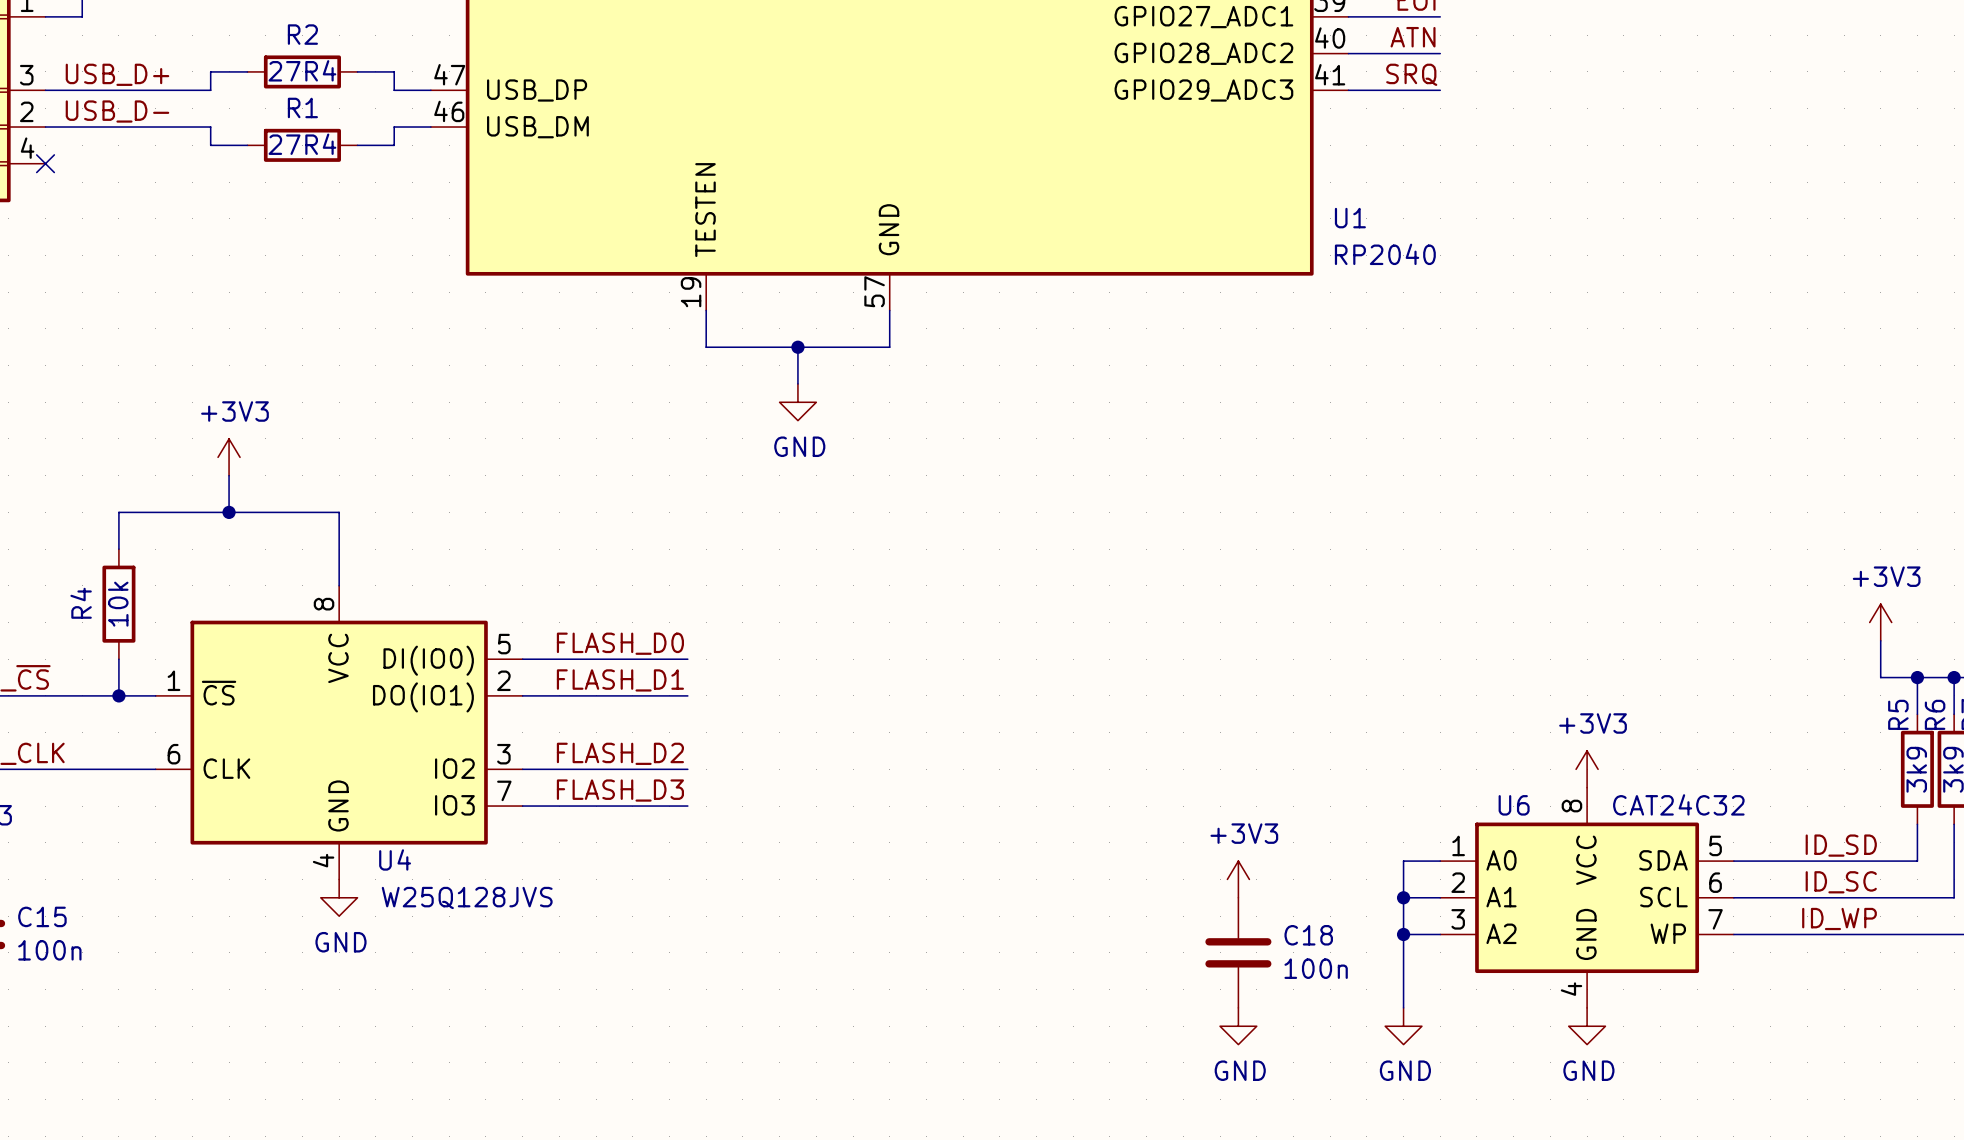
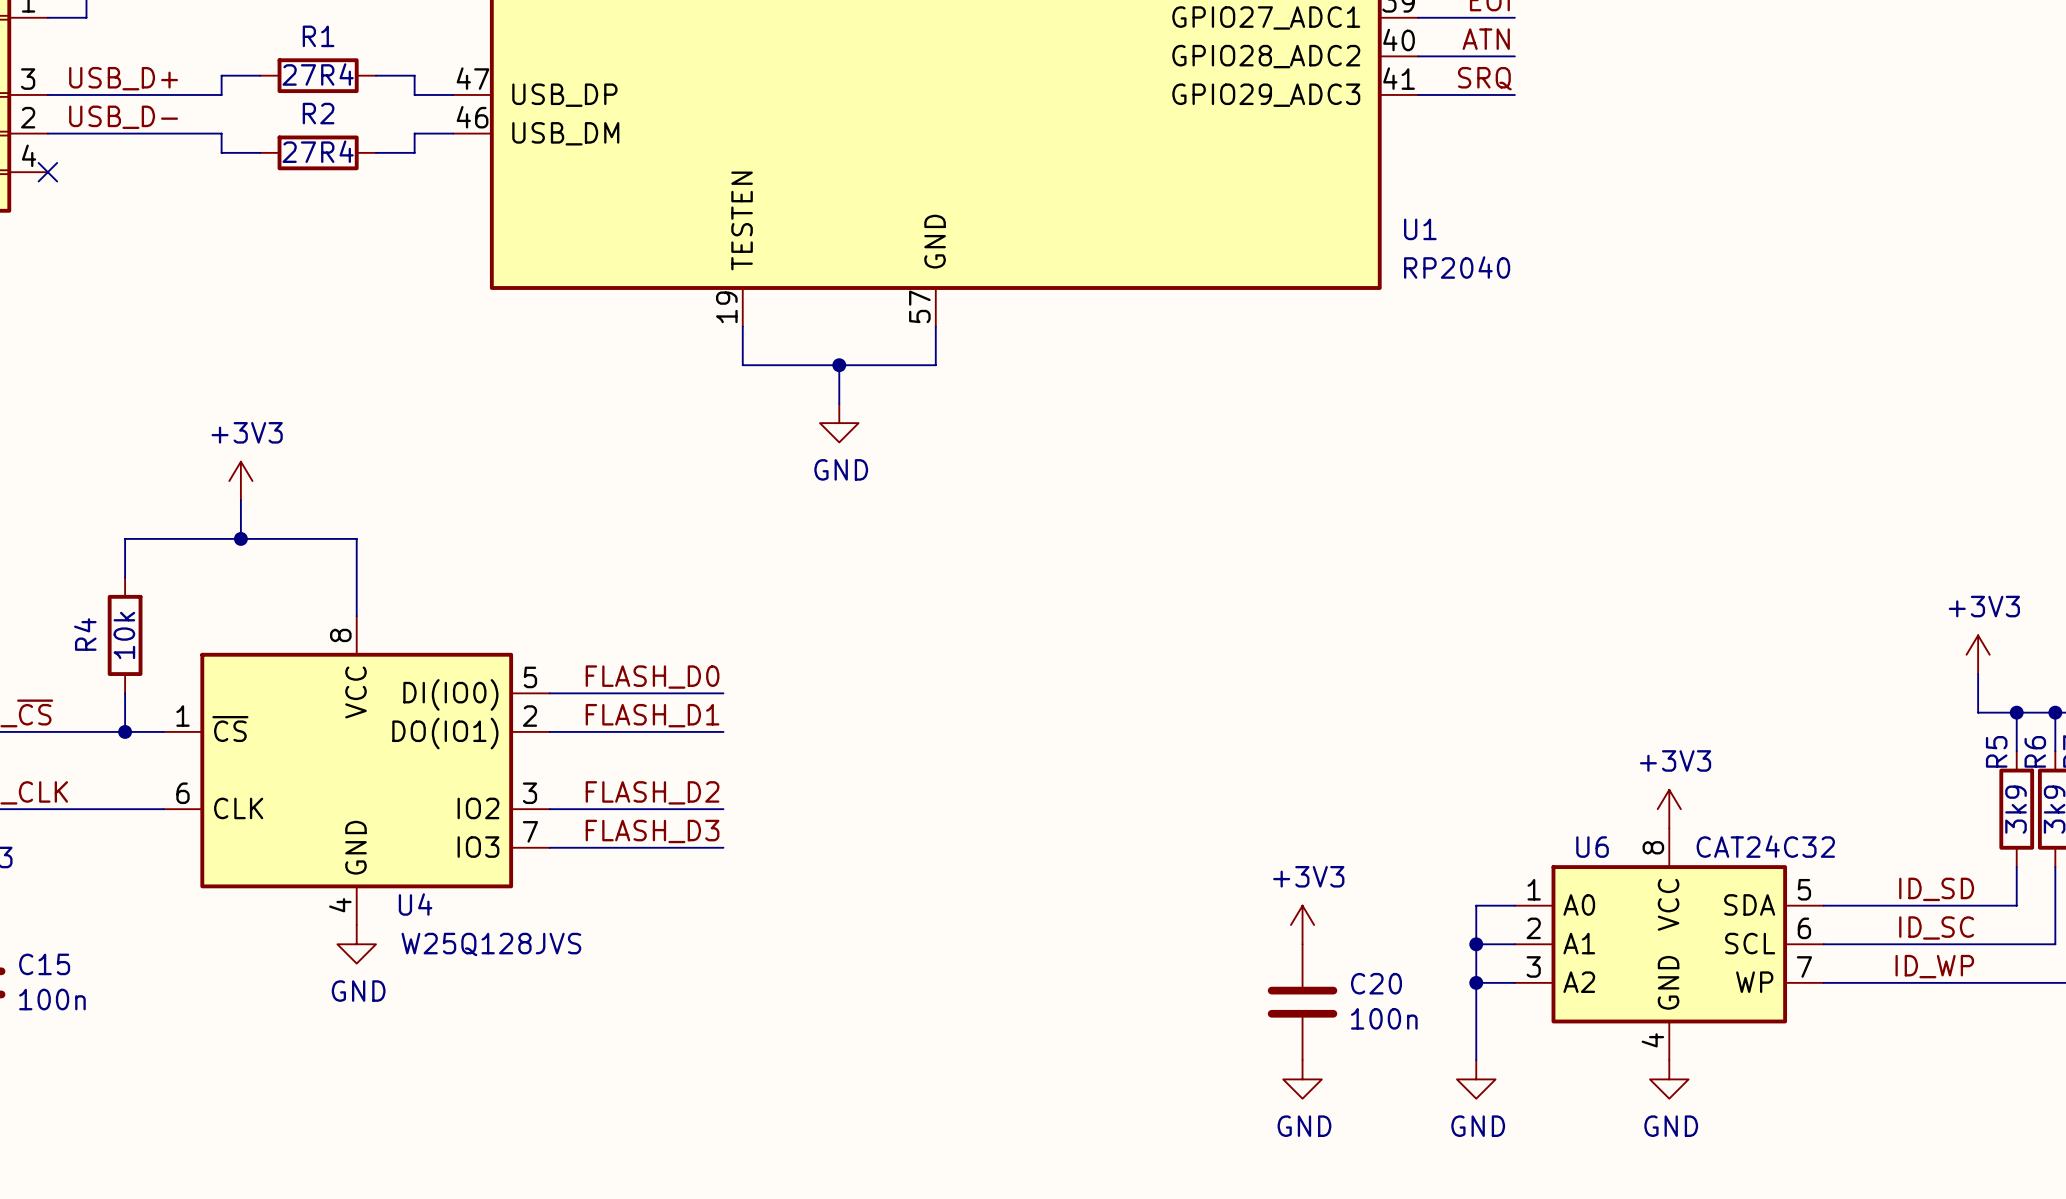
R2 name: R2 (302, 34) -> R1 (318, 36)
R1 name: R1 (302, 107) -> R2 (318, 113)
C18 name: C18 (1308, 935) -> C20 (1376, 983)

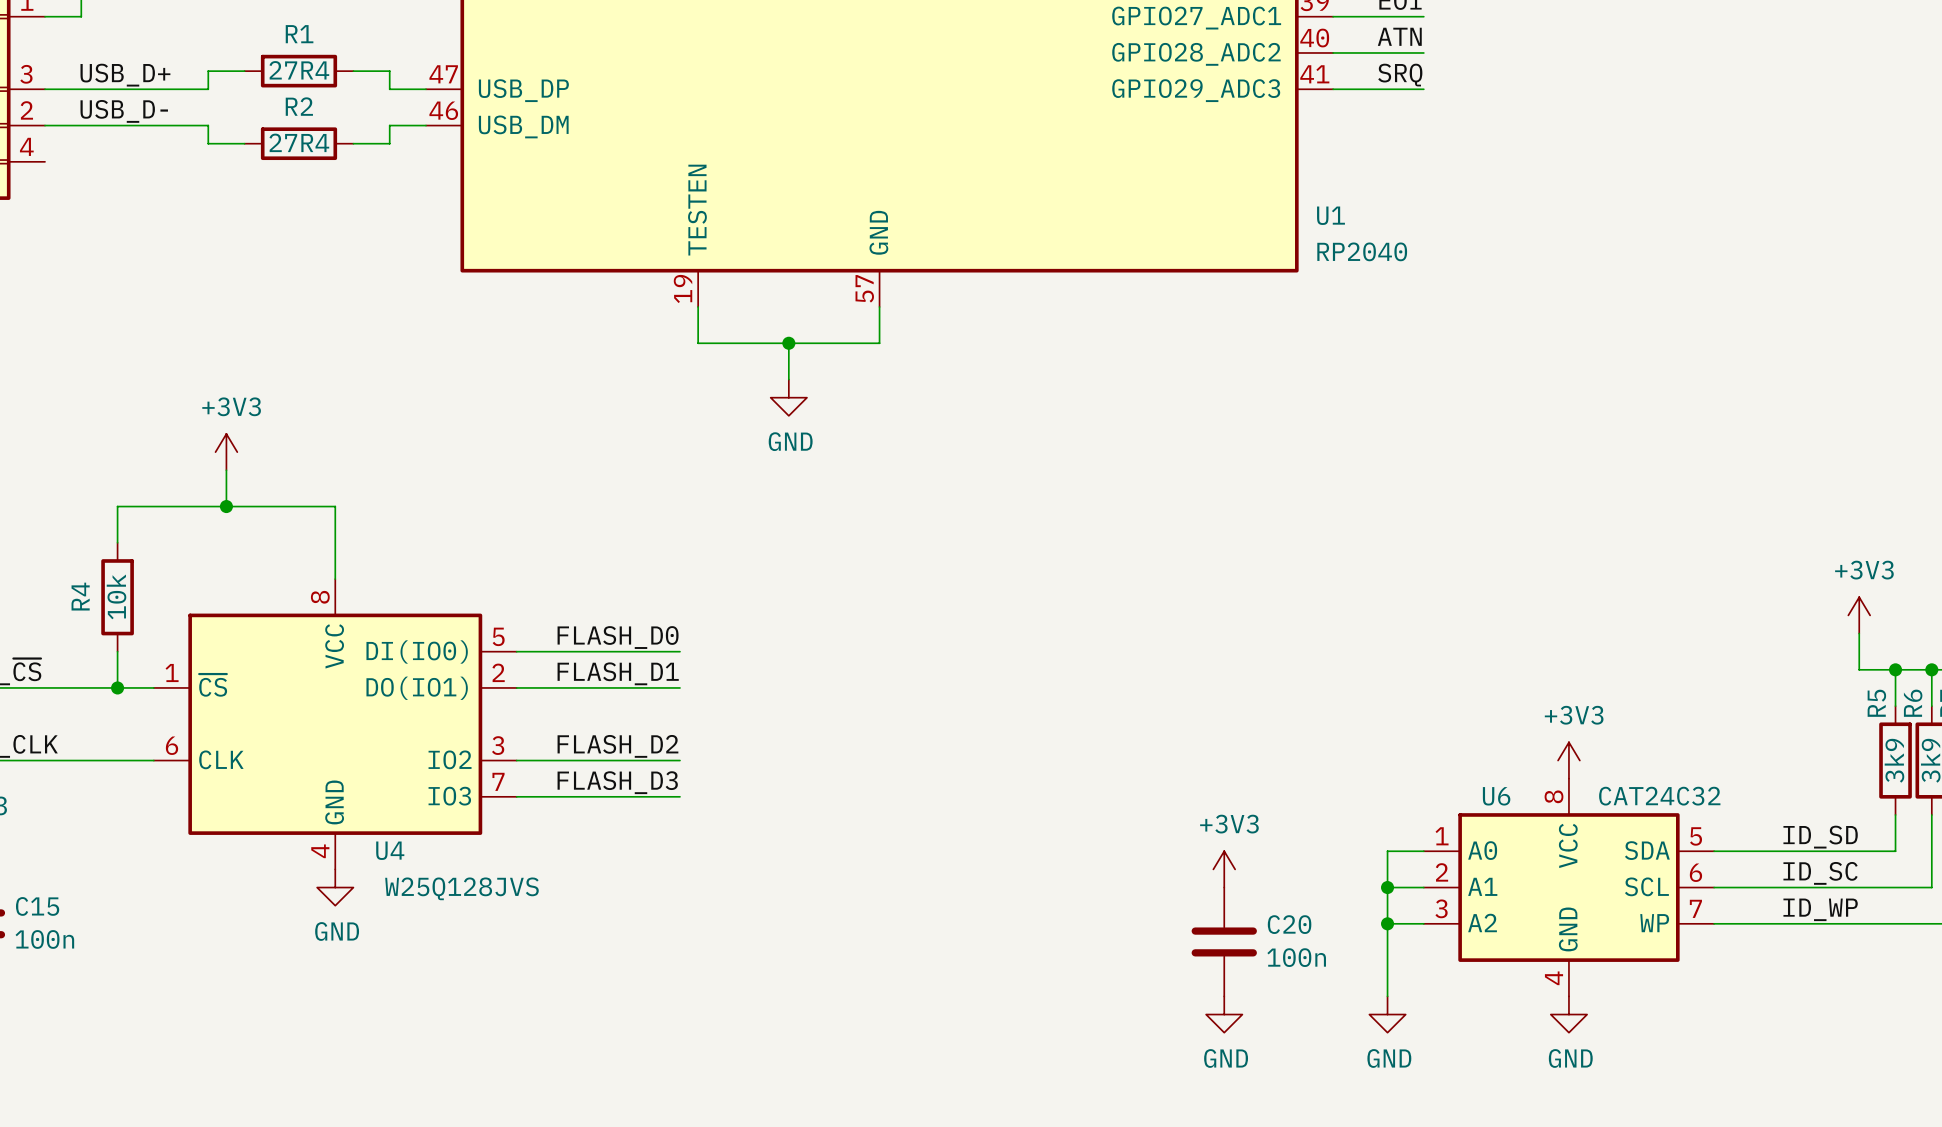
no-connect mark: (47, 172) -> none

